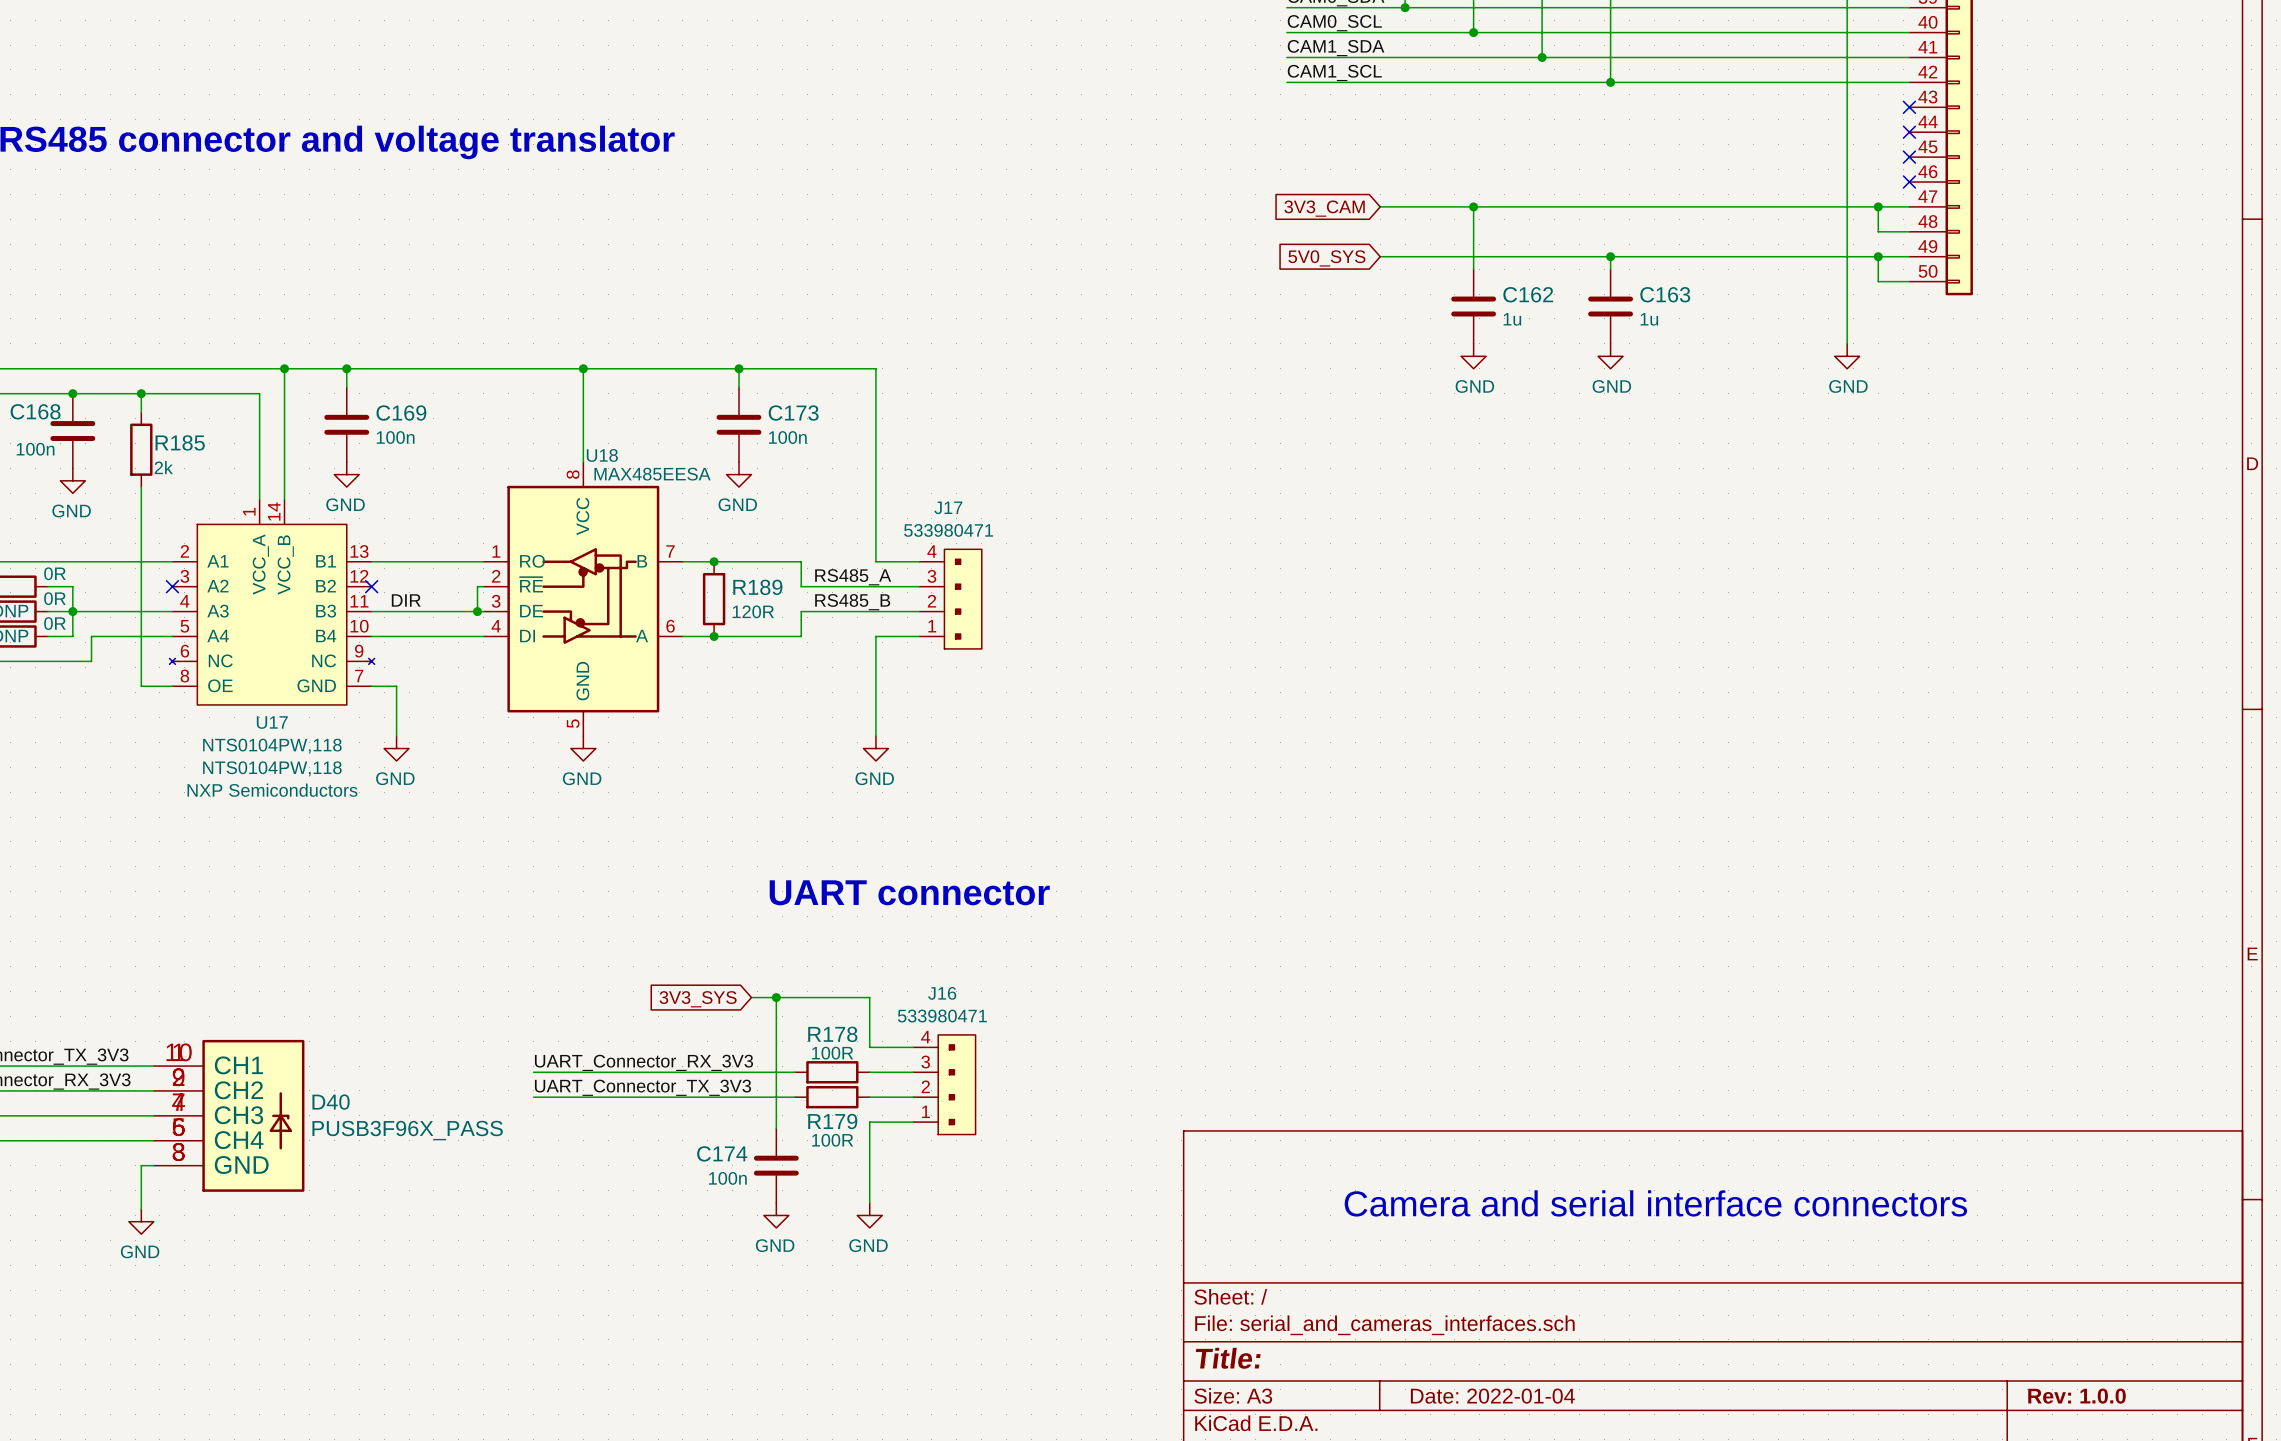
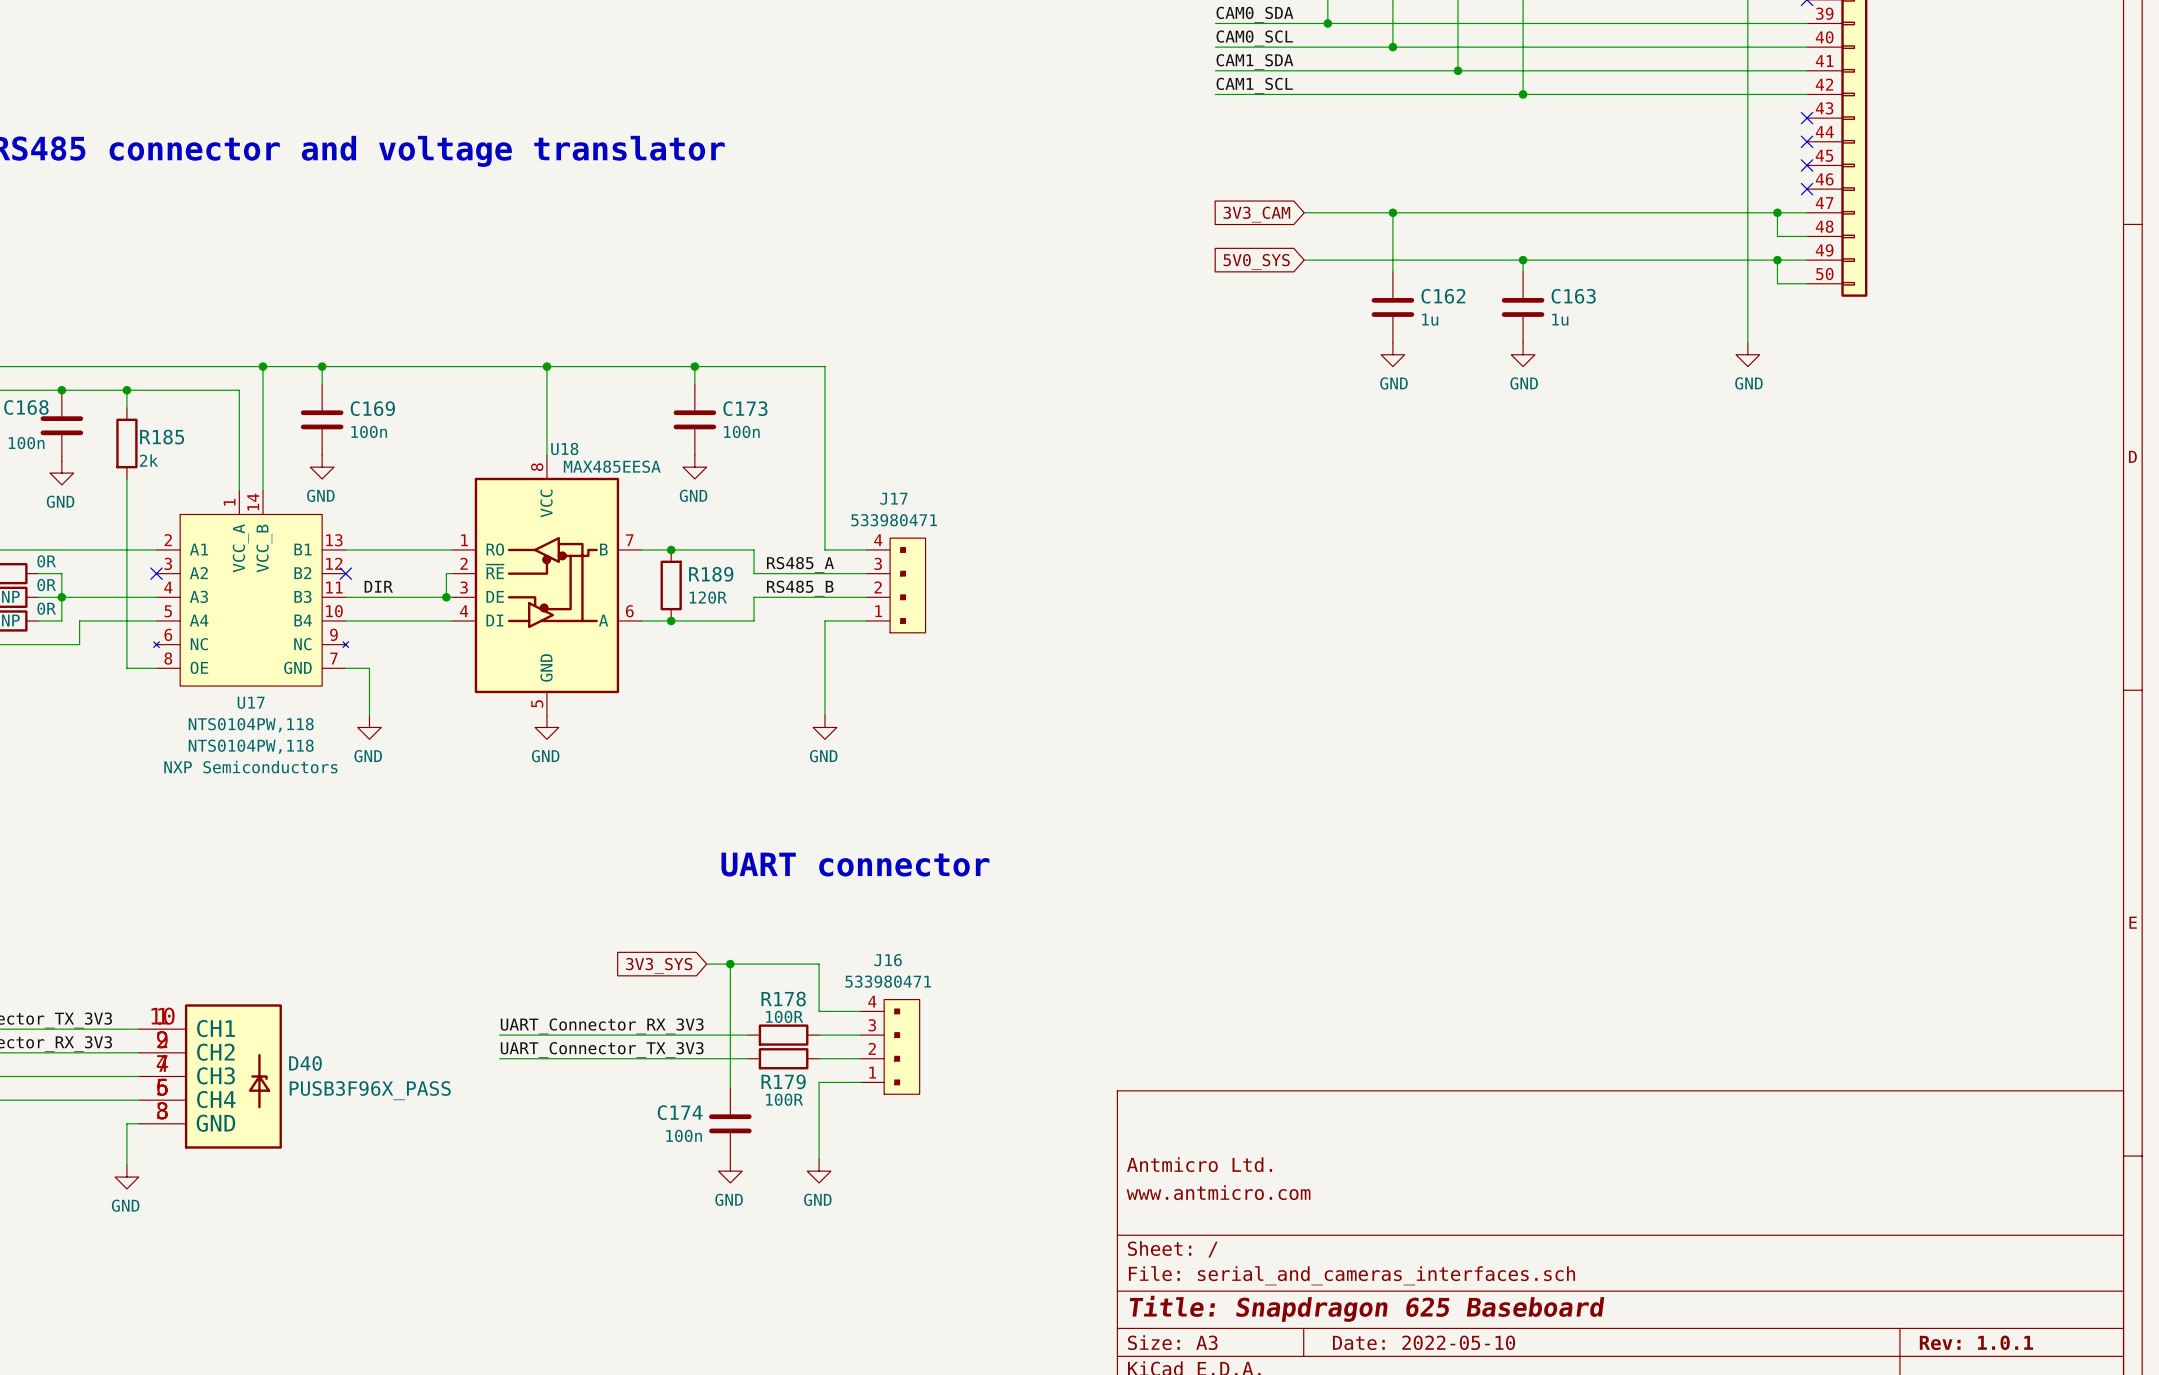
text: Camera and serial interface connectors (1655, 1203) -> none
title block: none -> Antmicro Ltd. (1199, 1164)
title block: none -> www.antmicro.com (1218, 1192)
title block: Title: (1228, 1358) -> Title: Snapdragon 625 Baseboard (1366, 1308)
title block: Date: 2022-01-04 (1492, 1396) -> Date: 2022-05-10 (1423, 1342)
title block: Rev: 1.0.0 (2077, 1396) -> Rev: 1.0.1 (1976, 1342)

